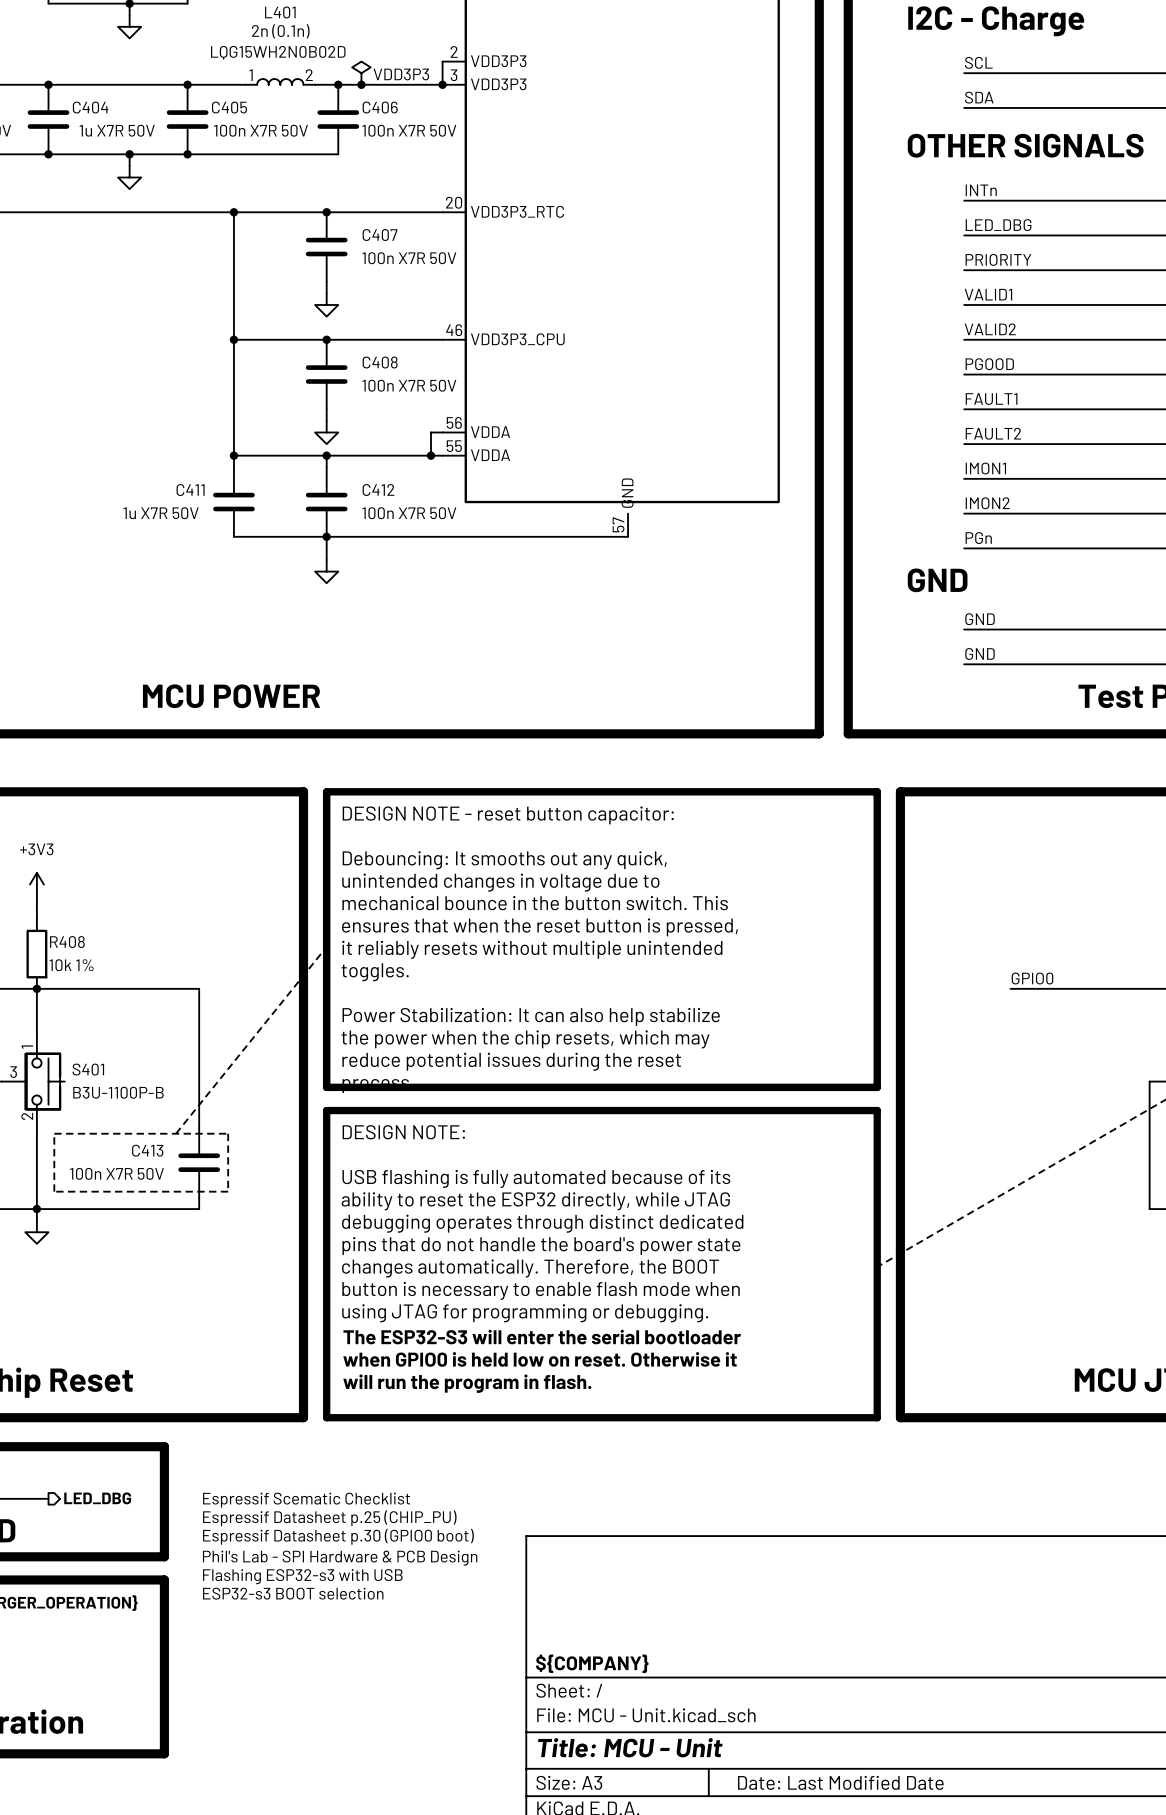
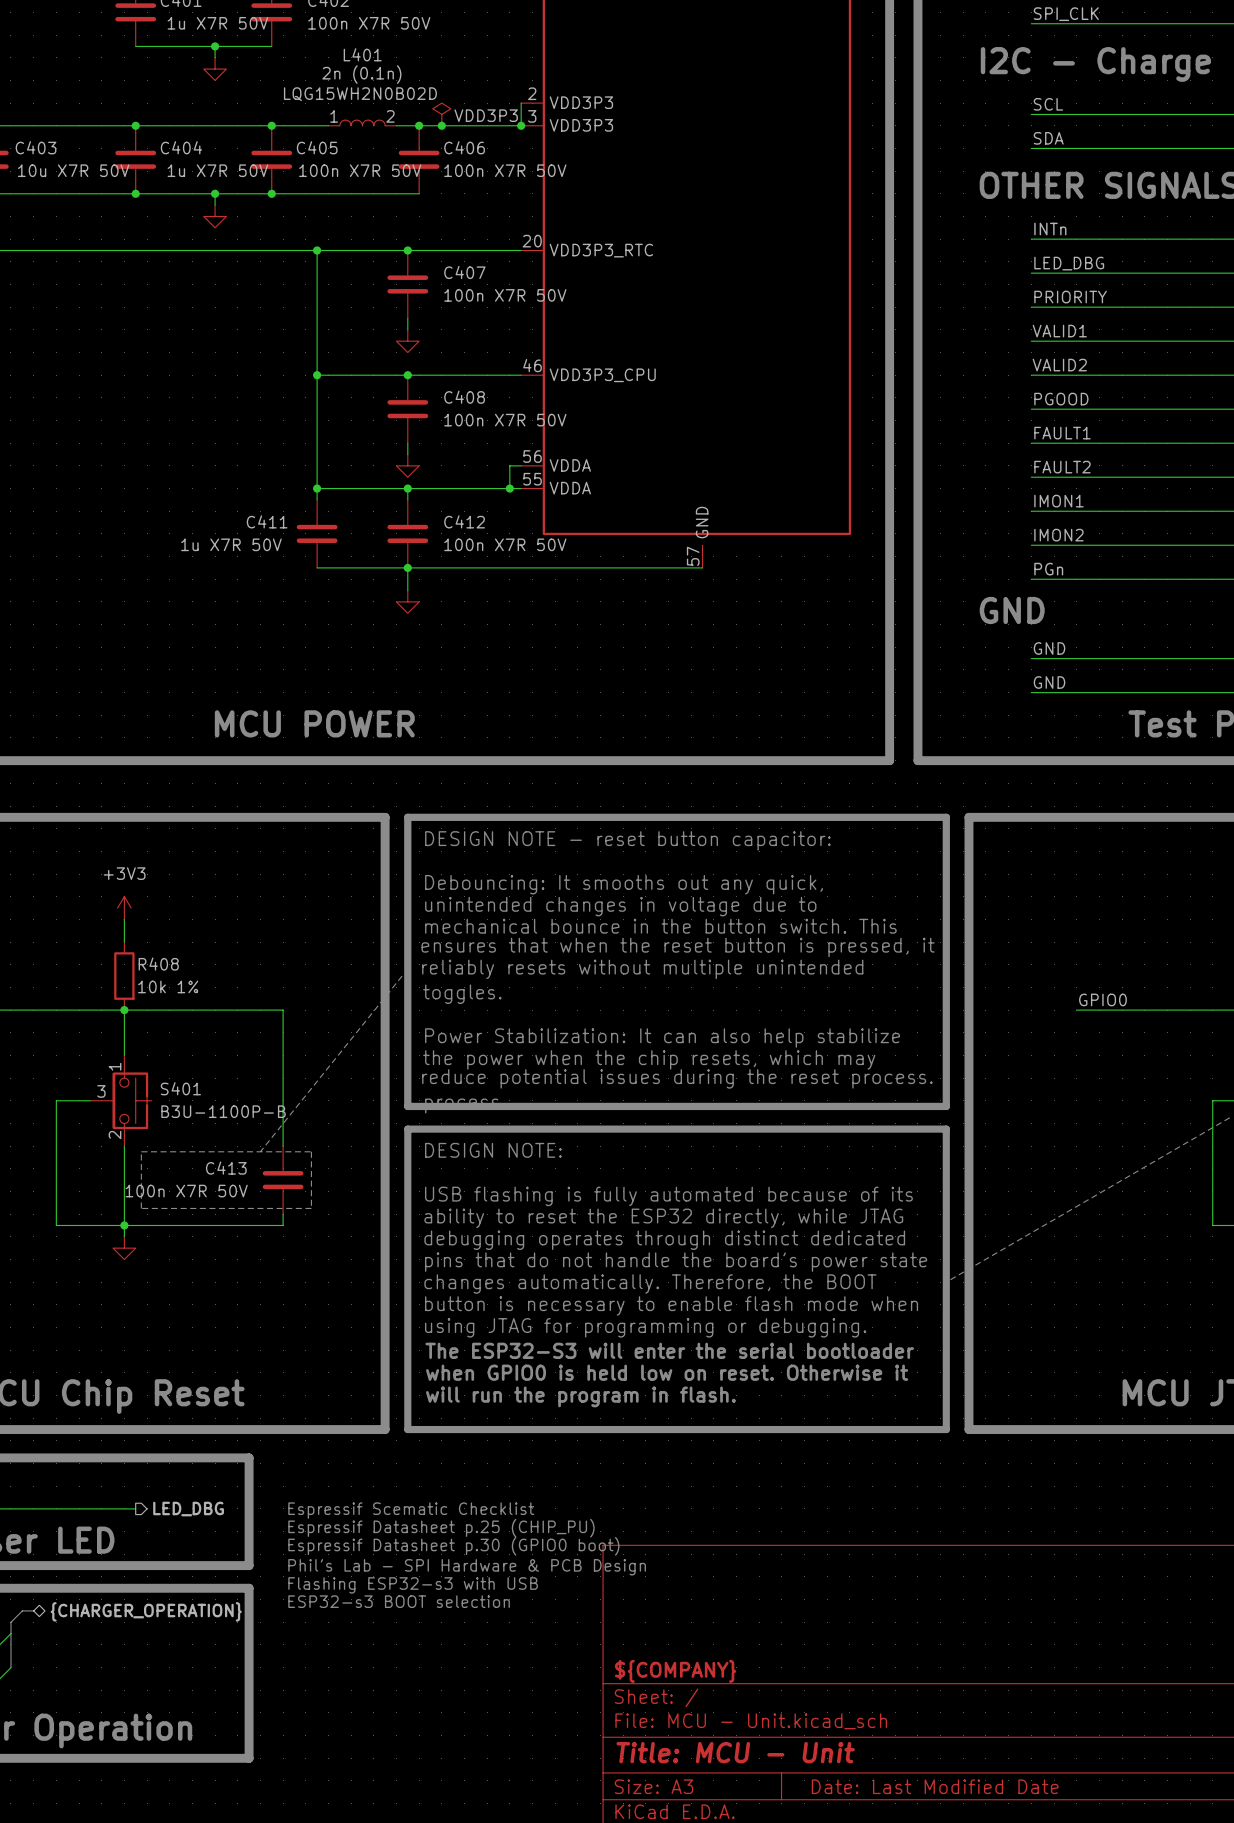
text: ensures that when the reset button is pressed, (540, 927) -> ensures that when the reset button is pressed, it (678, 947)
text: it reliably resets without multiple unintended (532, 949) -> reliably resets without multiple unintended (642, 969)
text: reduce potential issues during the reset (511, 1061) -> reduce potential issues during the reset process. (677, 1078)

